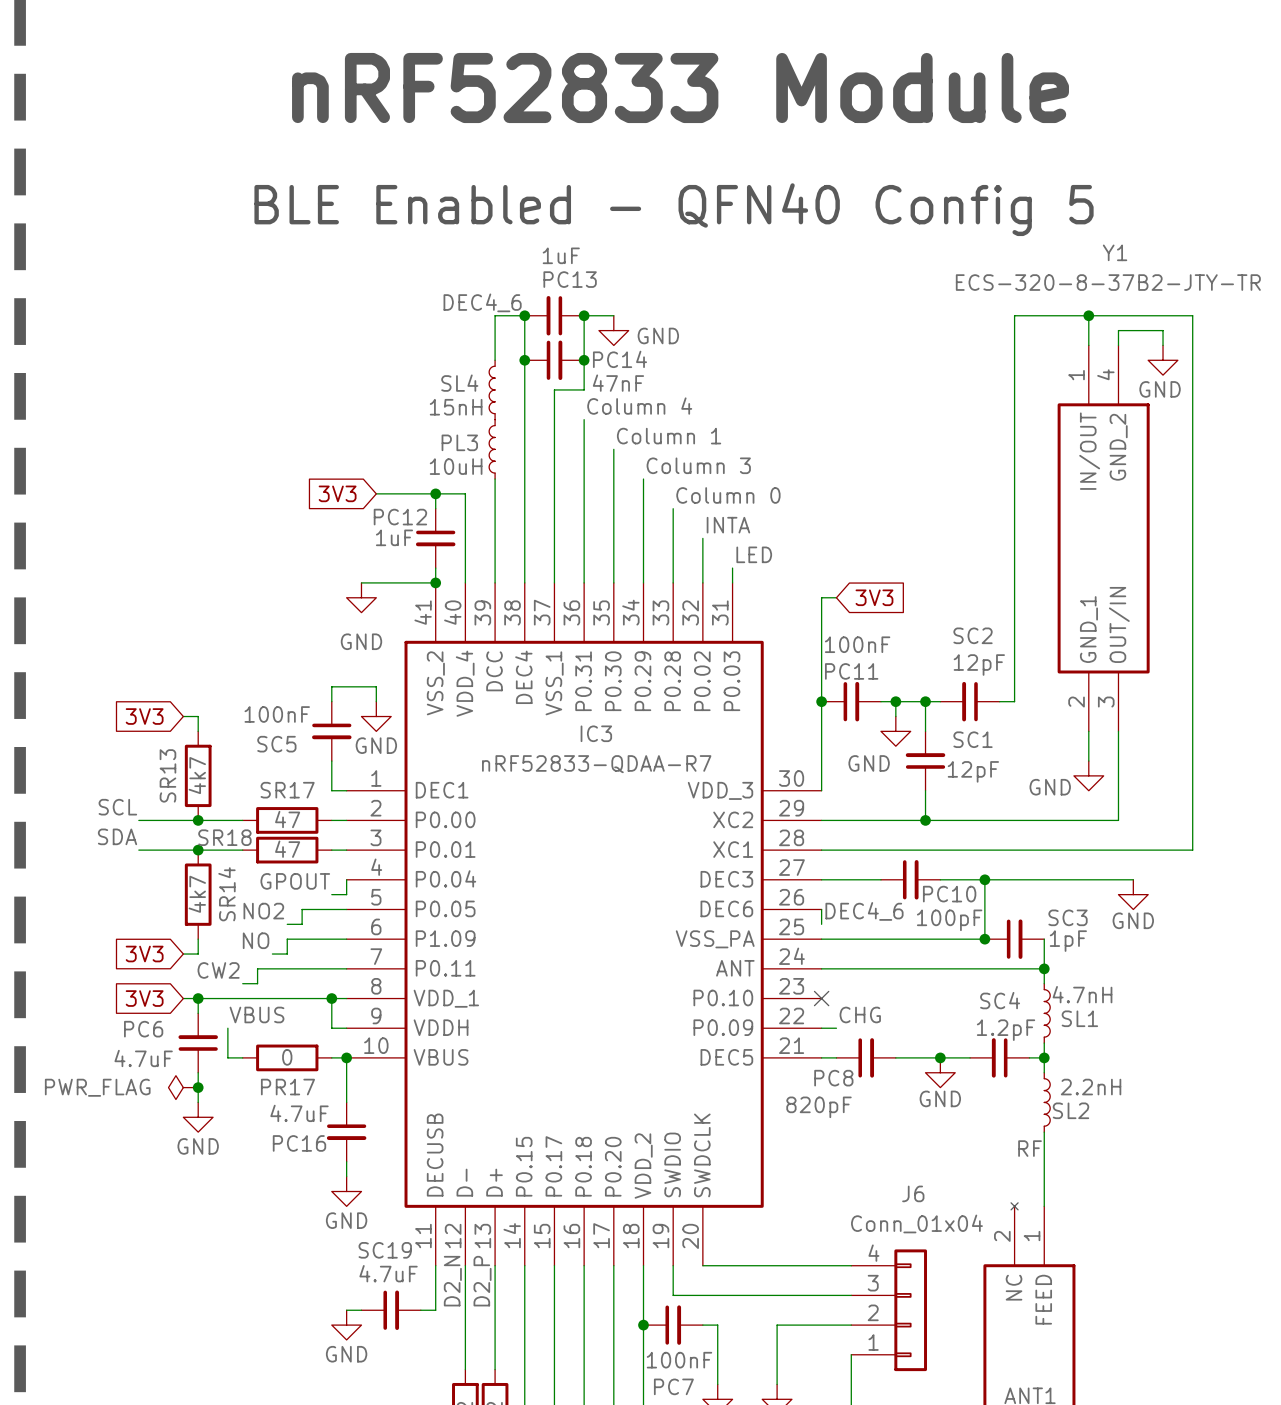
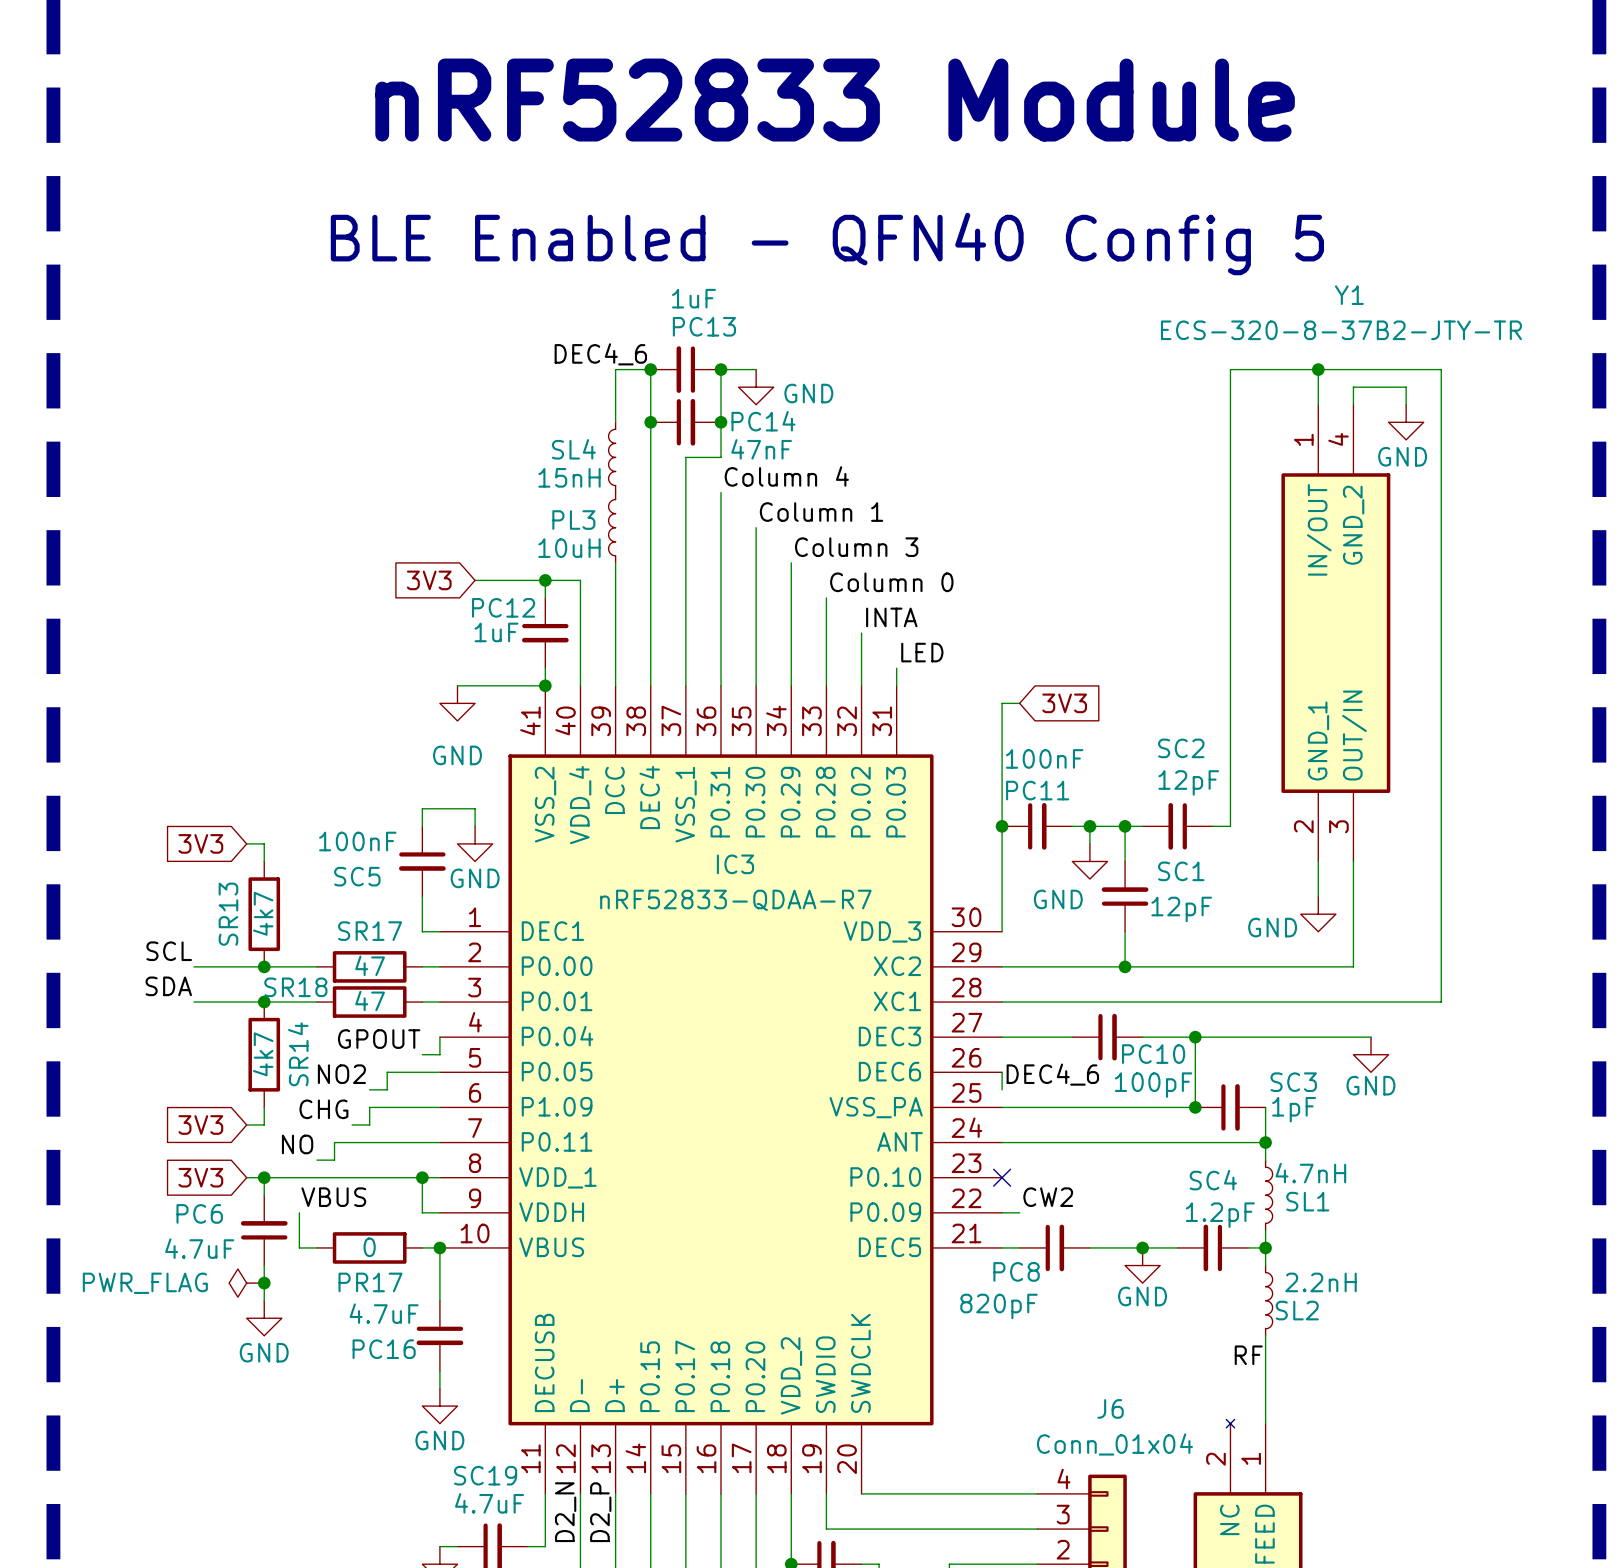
label: NO (256, 940) -> CHG (323, 1109)
label: CW2 (218, 970) -> NO (297, 1144)
label: CHG (860, 1014) -> CW2 (1048, 1197)

